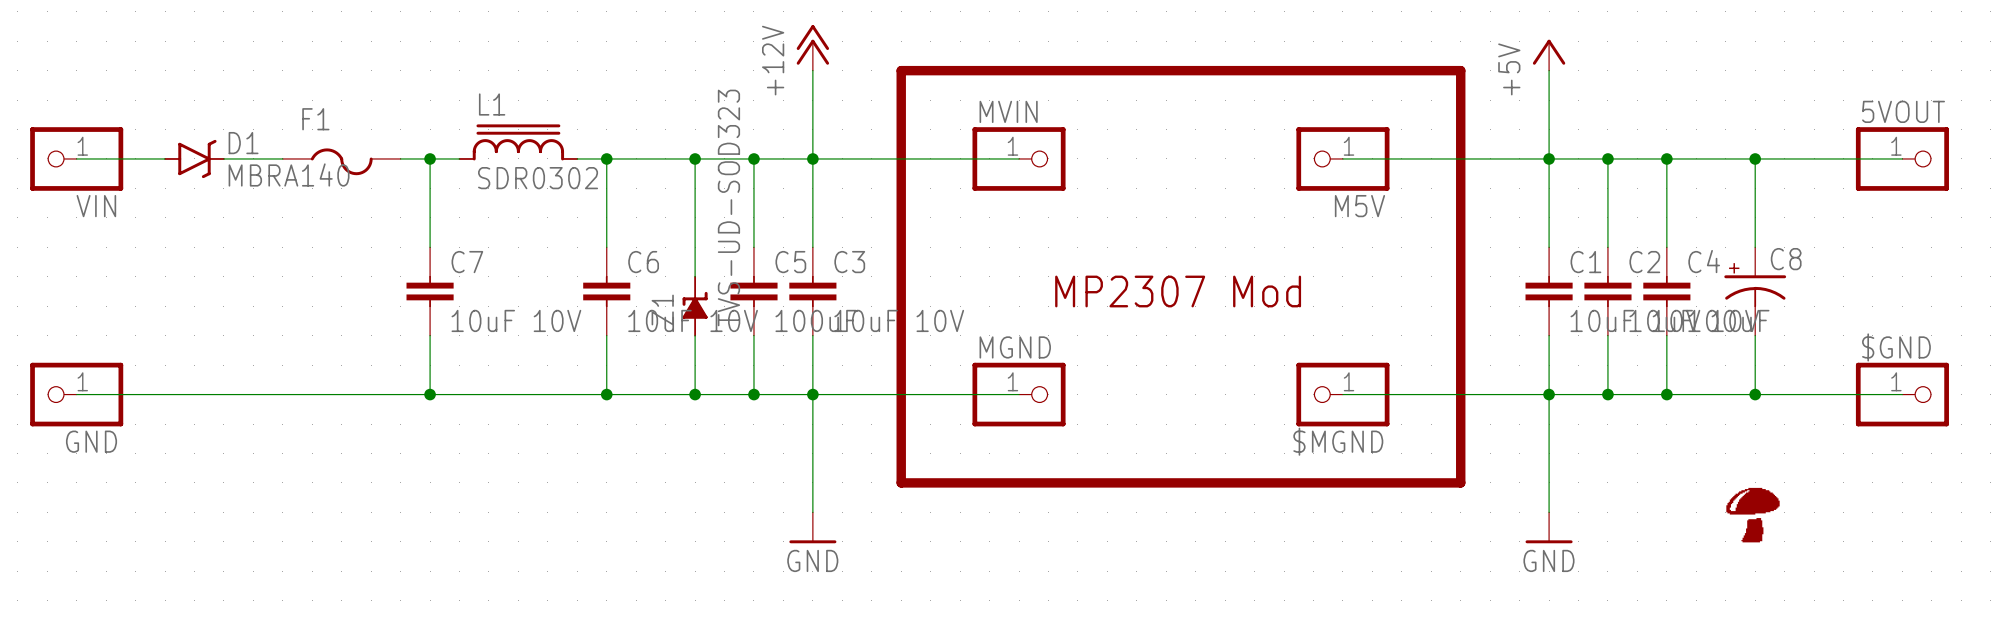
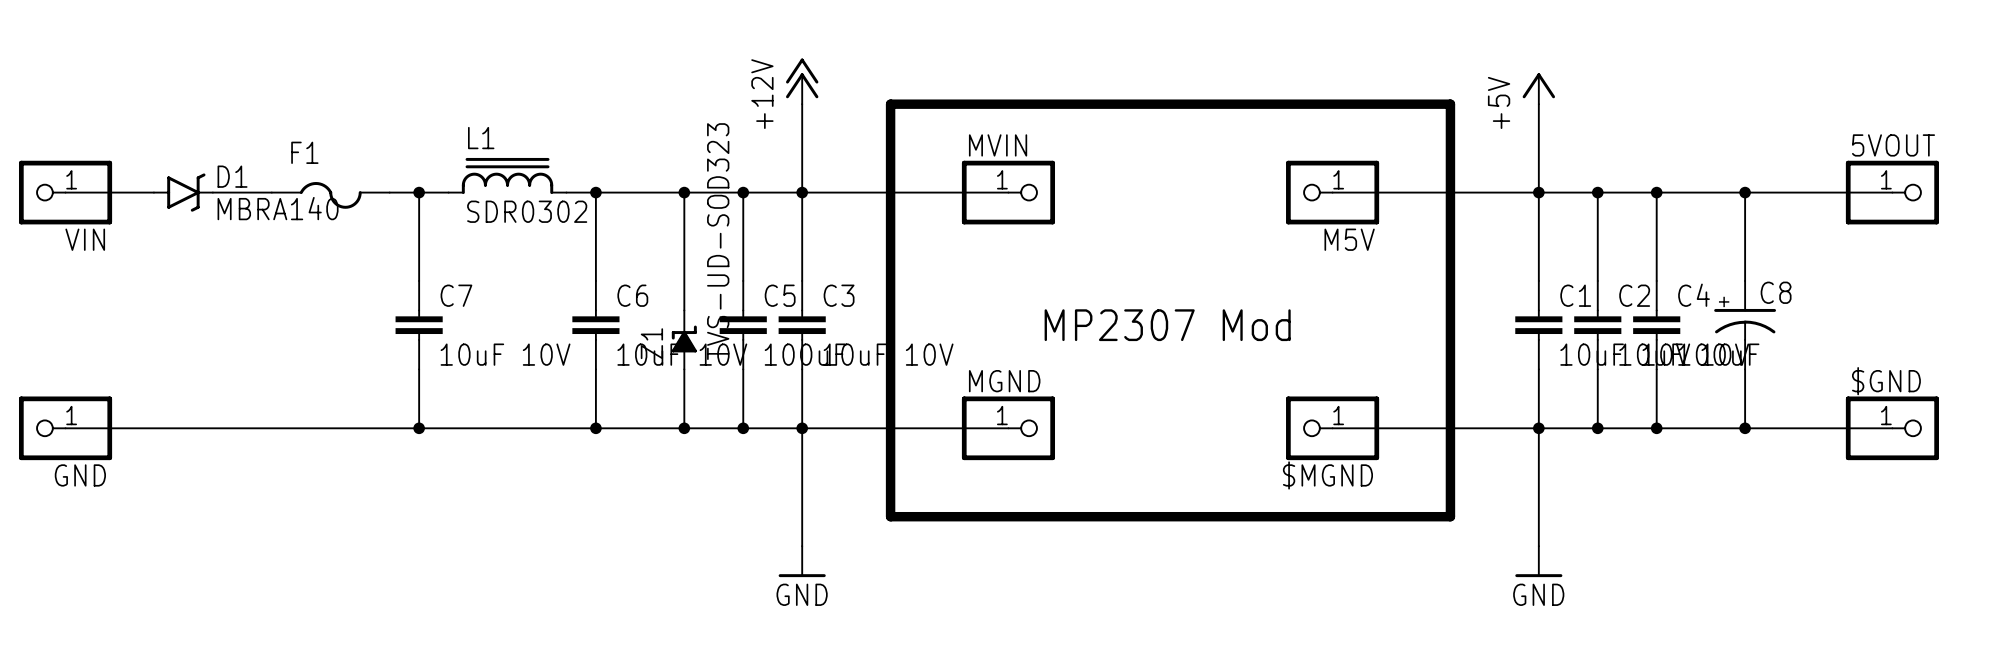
part: (1753, 515) -> none

